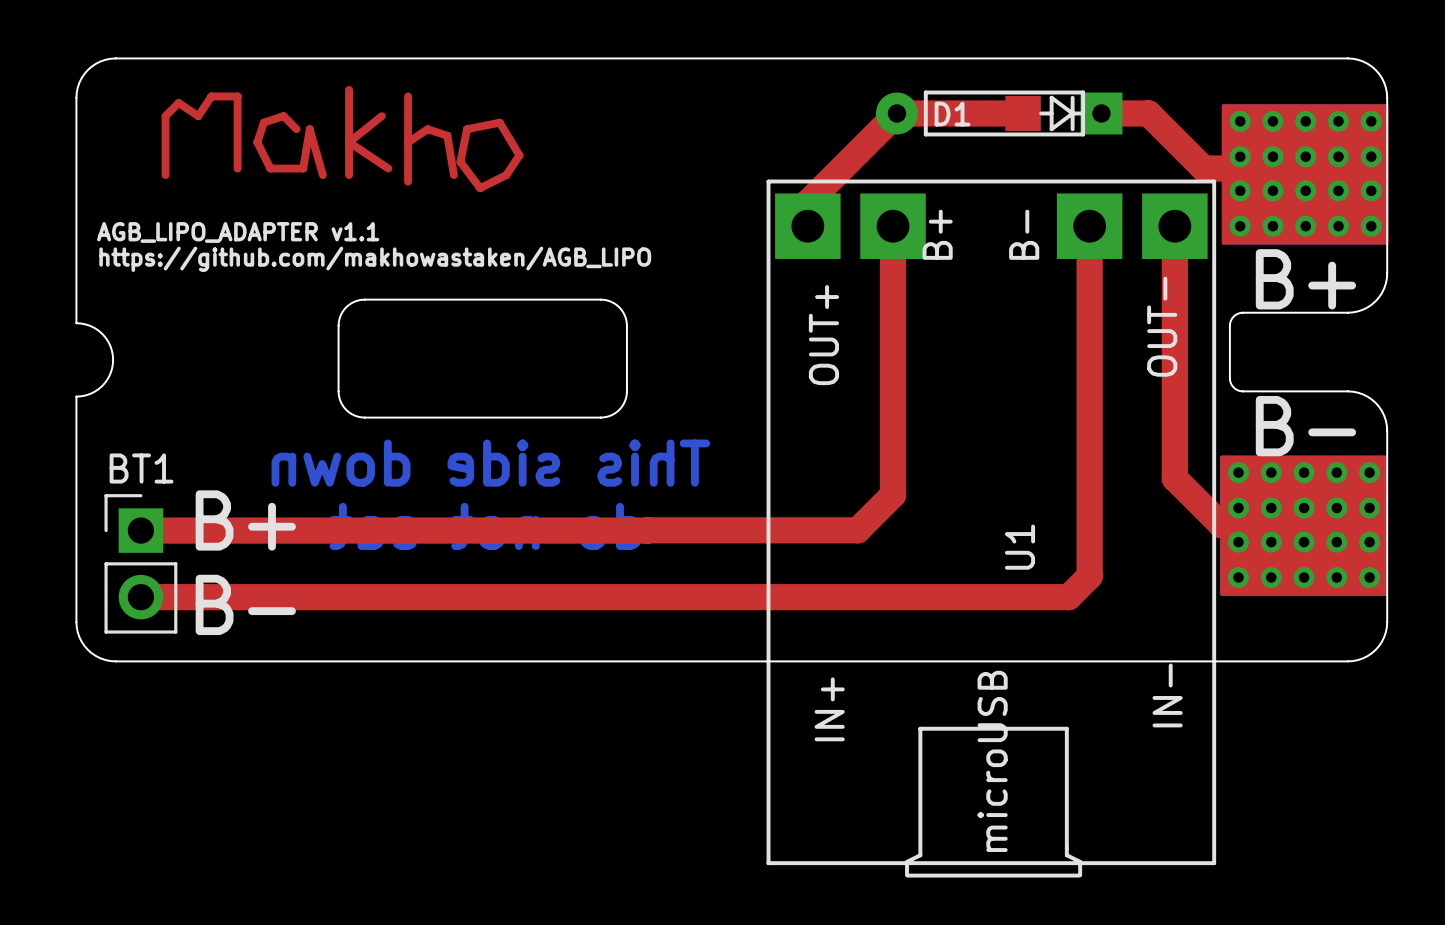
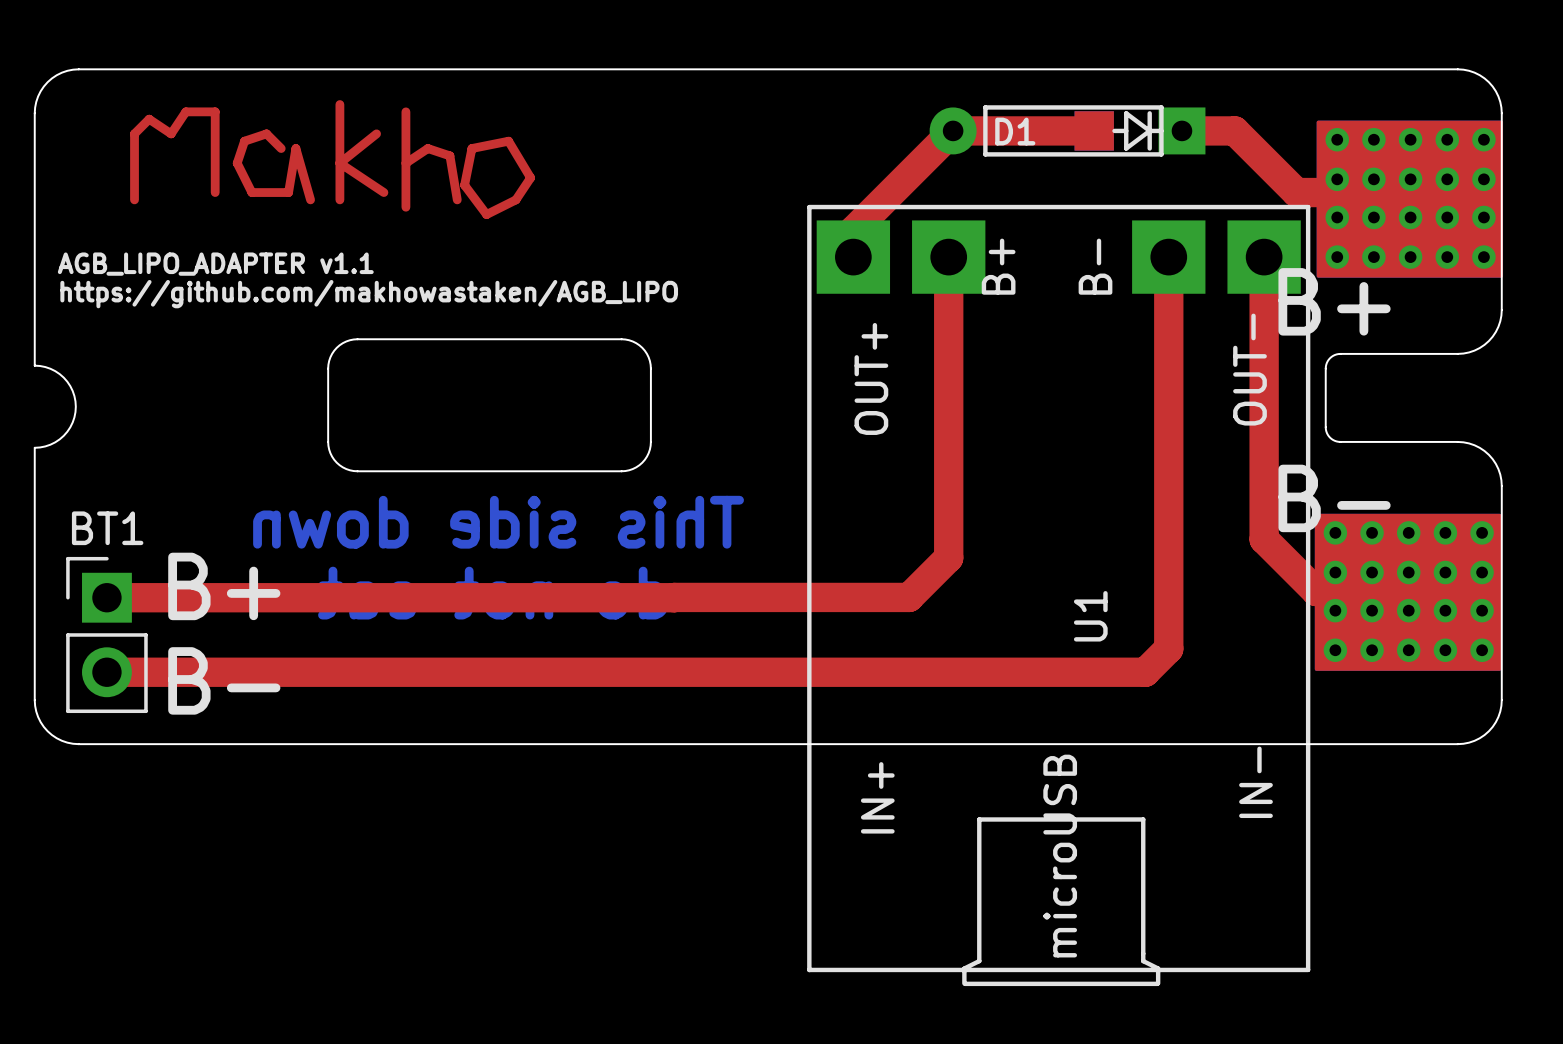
text position: B+ (1305, 279) -> B+ (1334, 301)
text position: B- (1305, 426) -> B- (1334, 498)

